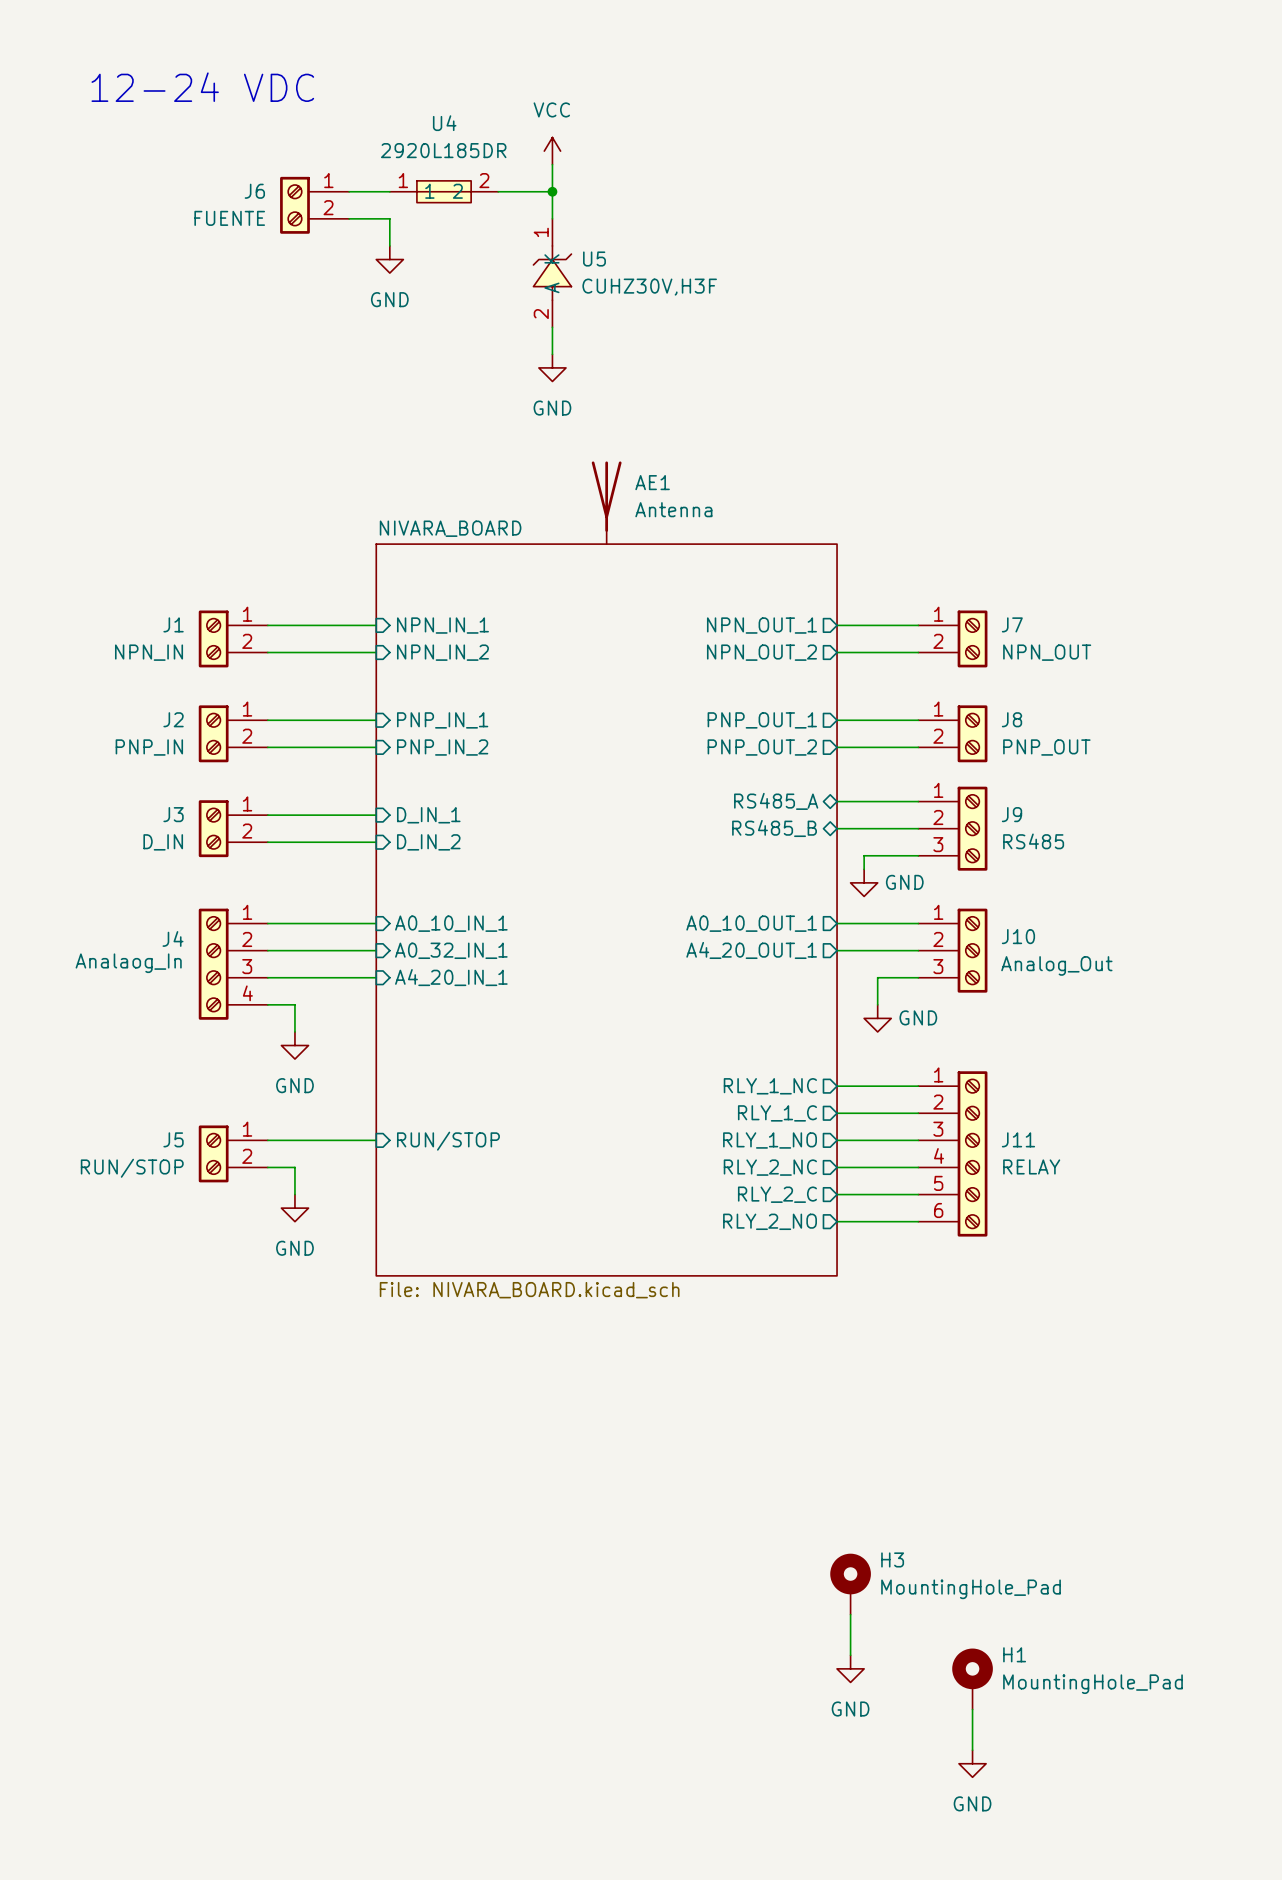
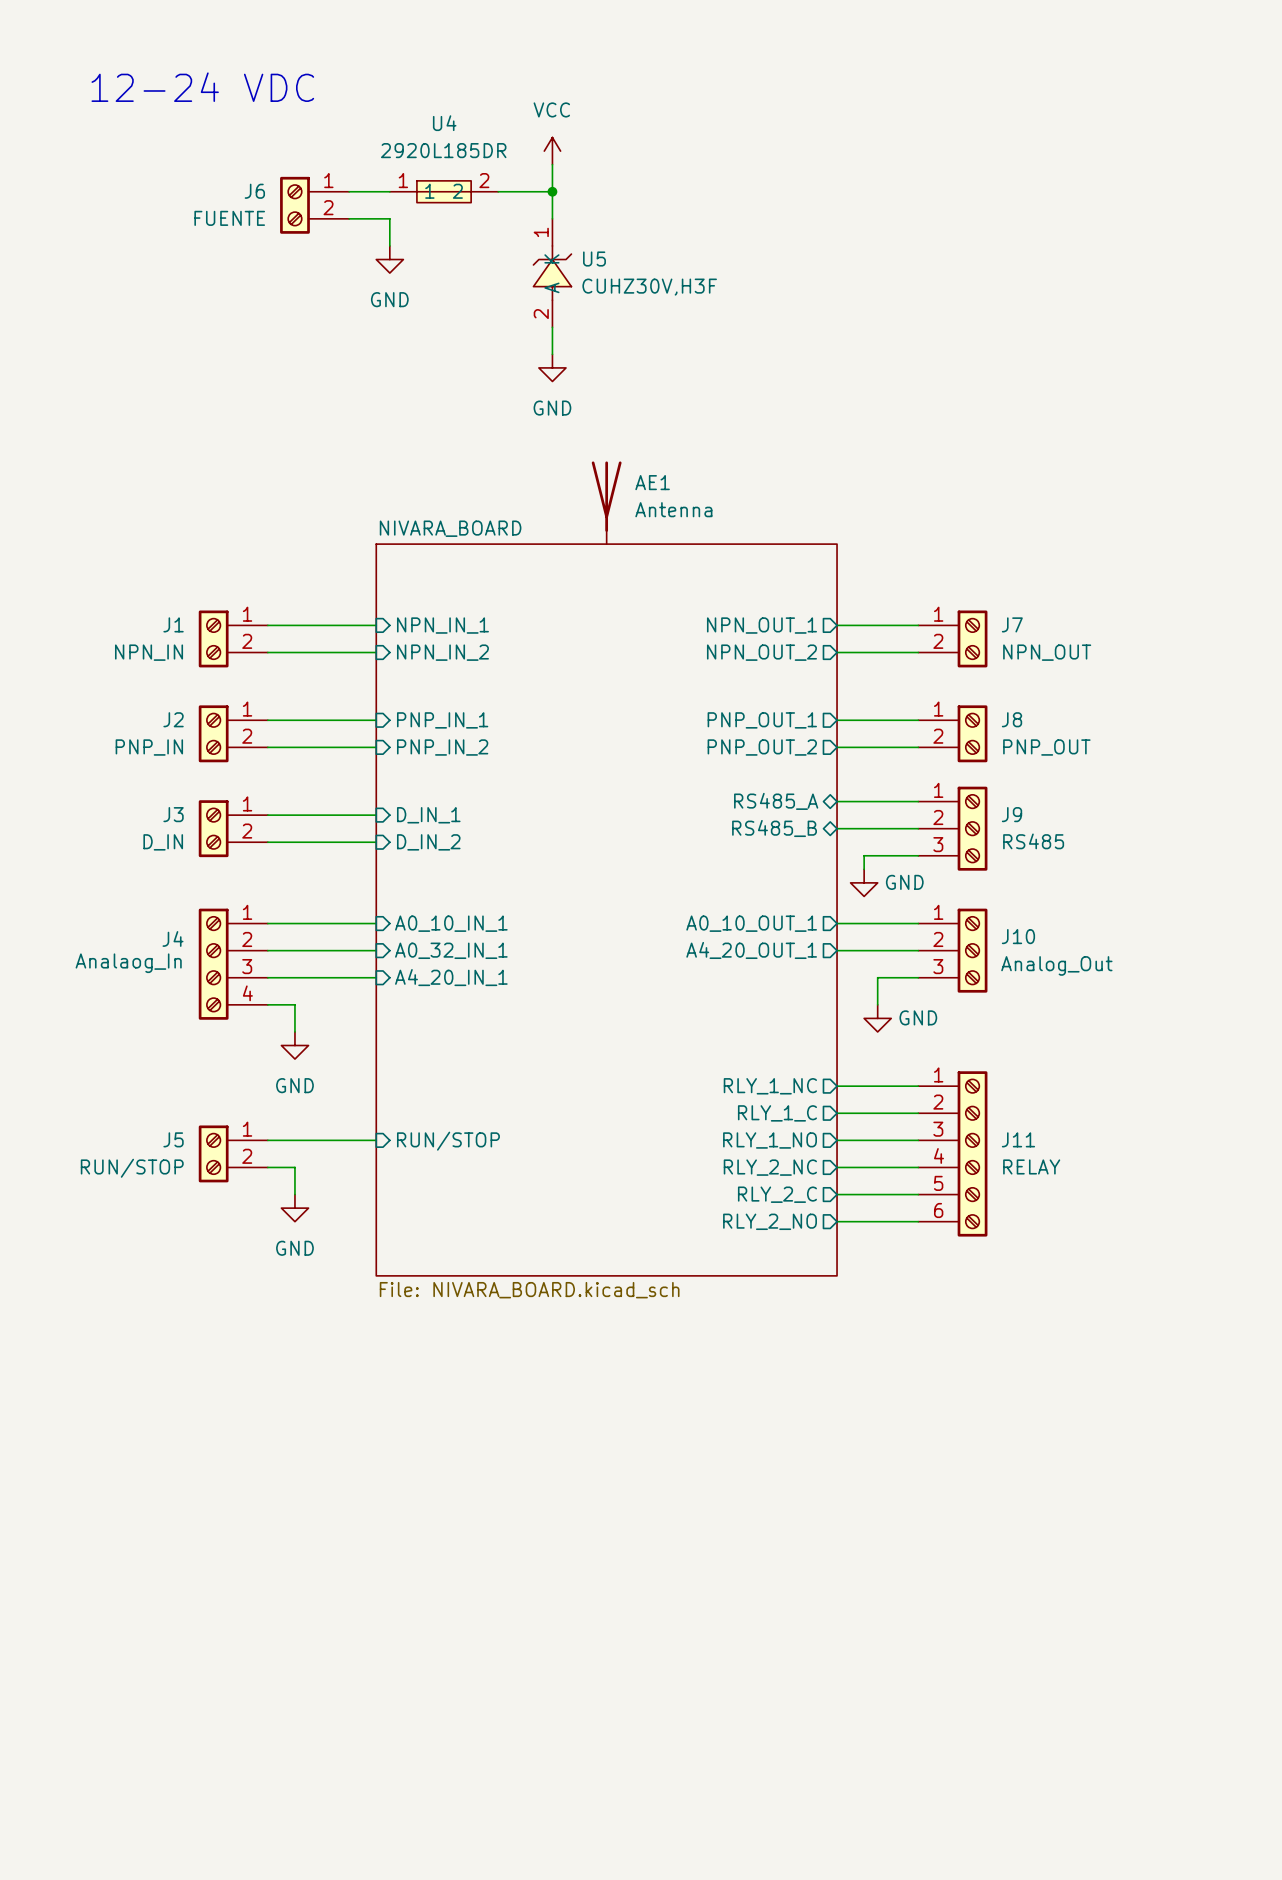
H3: MountingHole_Pad (850, 1584) -> none
wire: (850, 1614) (850, 1655) -> none
power symbol: GND (850, 1668) -> none
H1: MountingHole_Pad (972, 1679) -> none
wire: (972, 1709) (972, 1750) -> none
power symbol: GND (972, 1763) -> none

